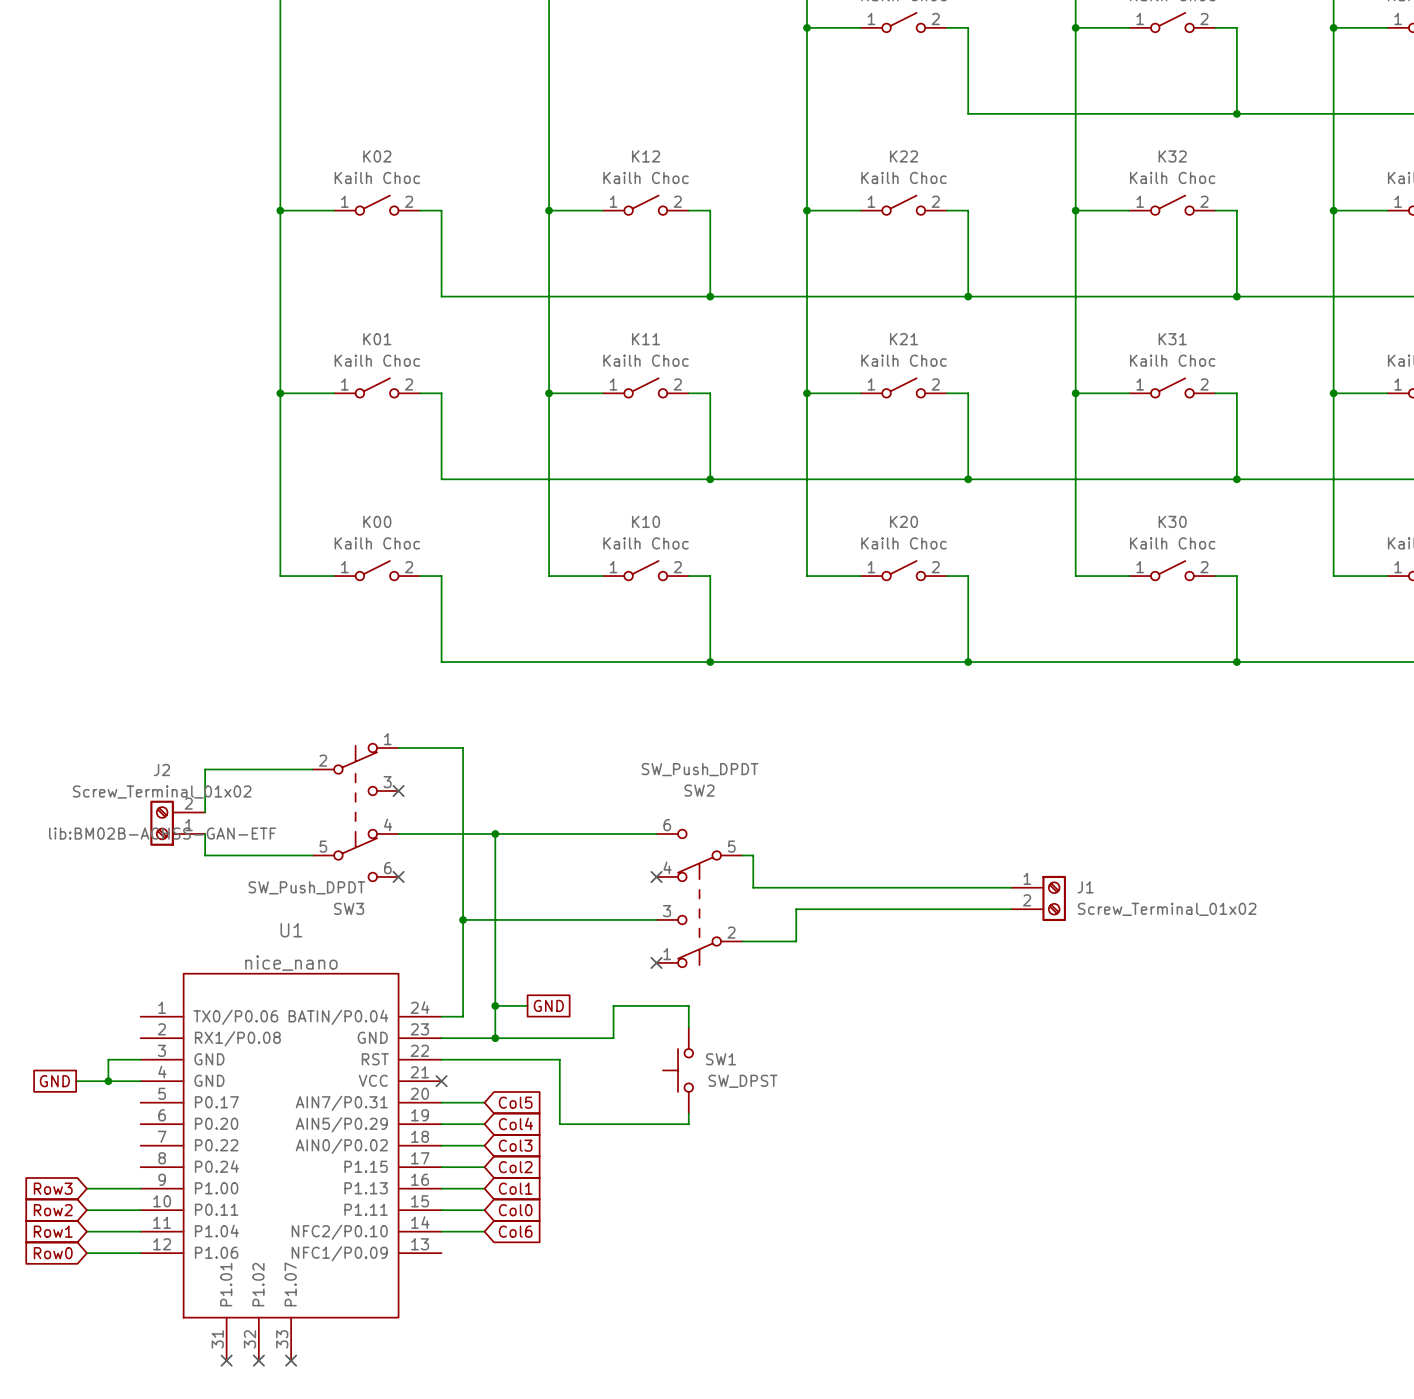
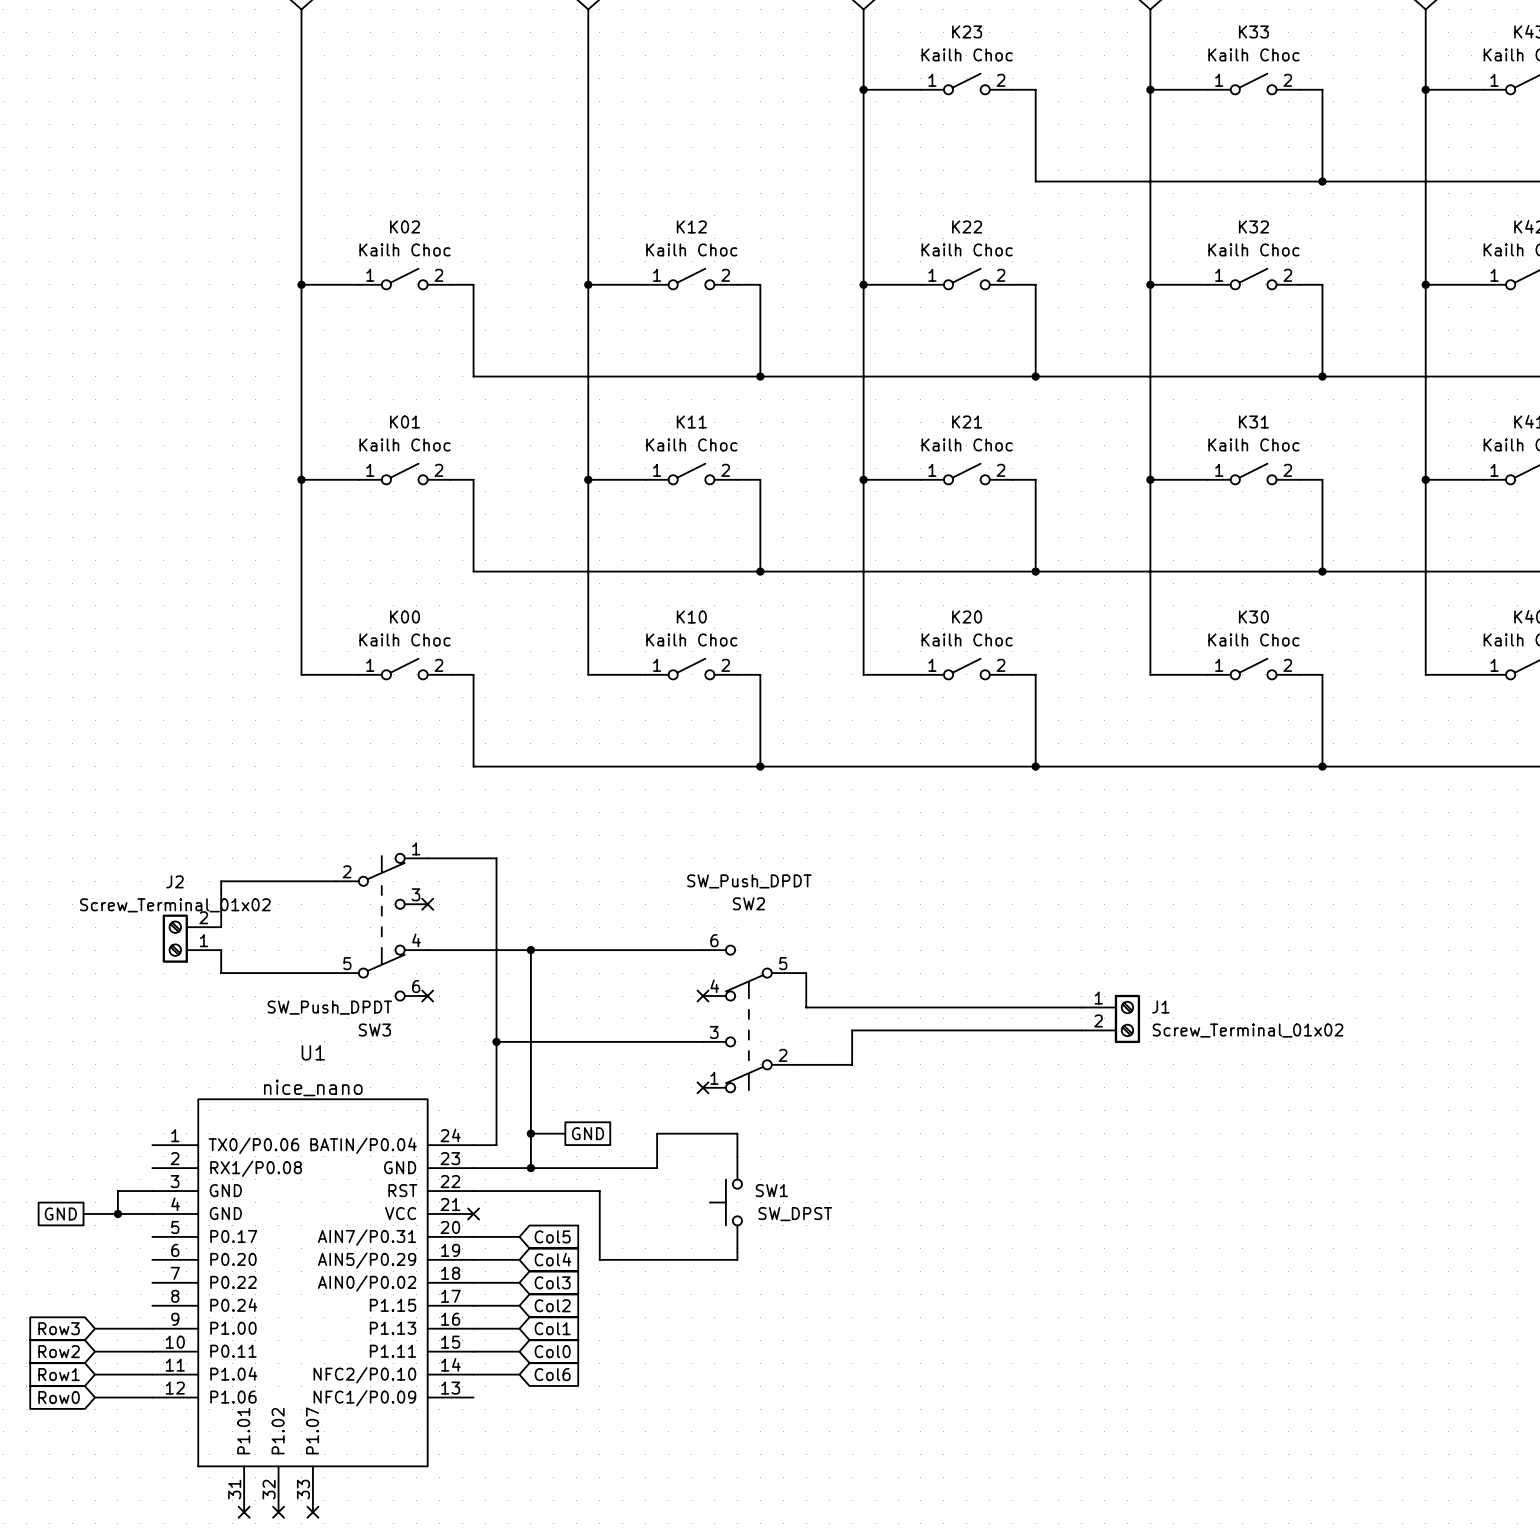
J2 text: lib:BM02B-ACHSS-GAN-ETF (162, 833) -> none

